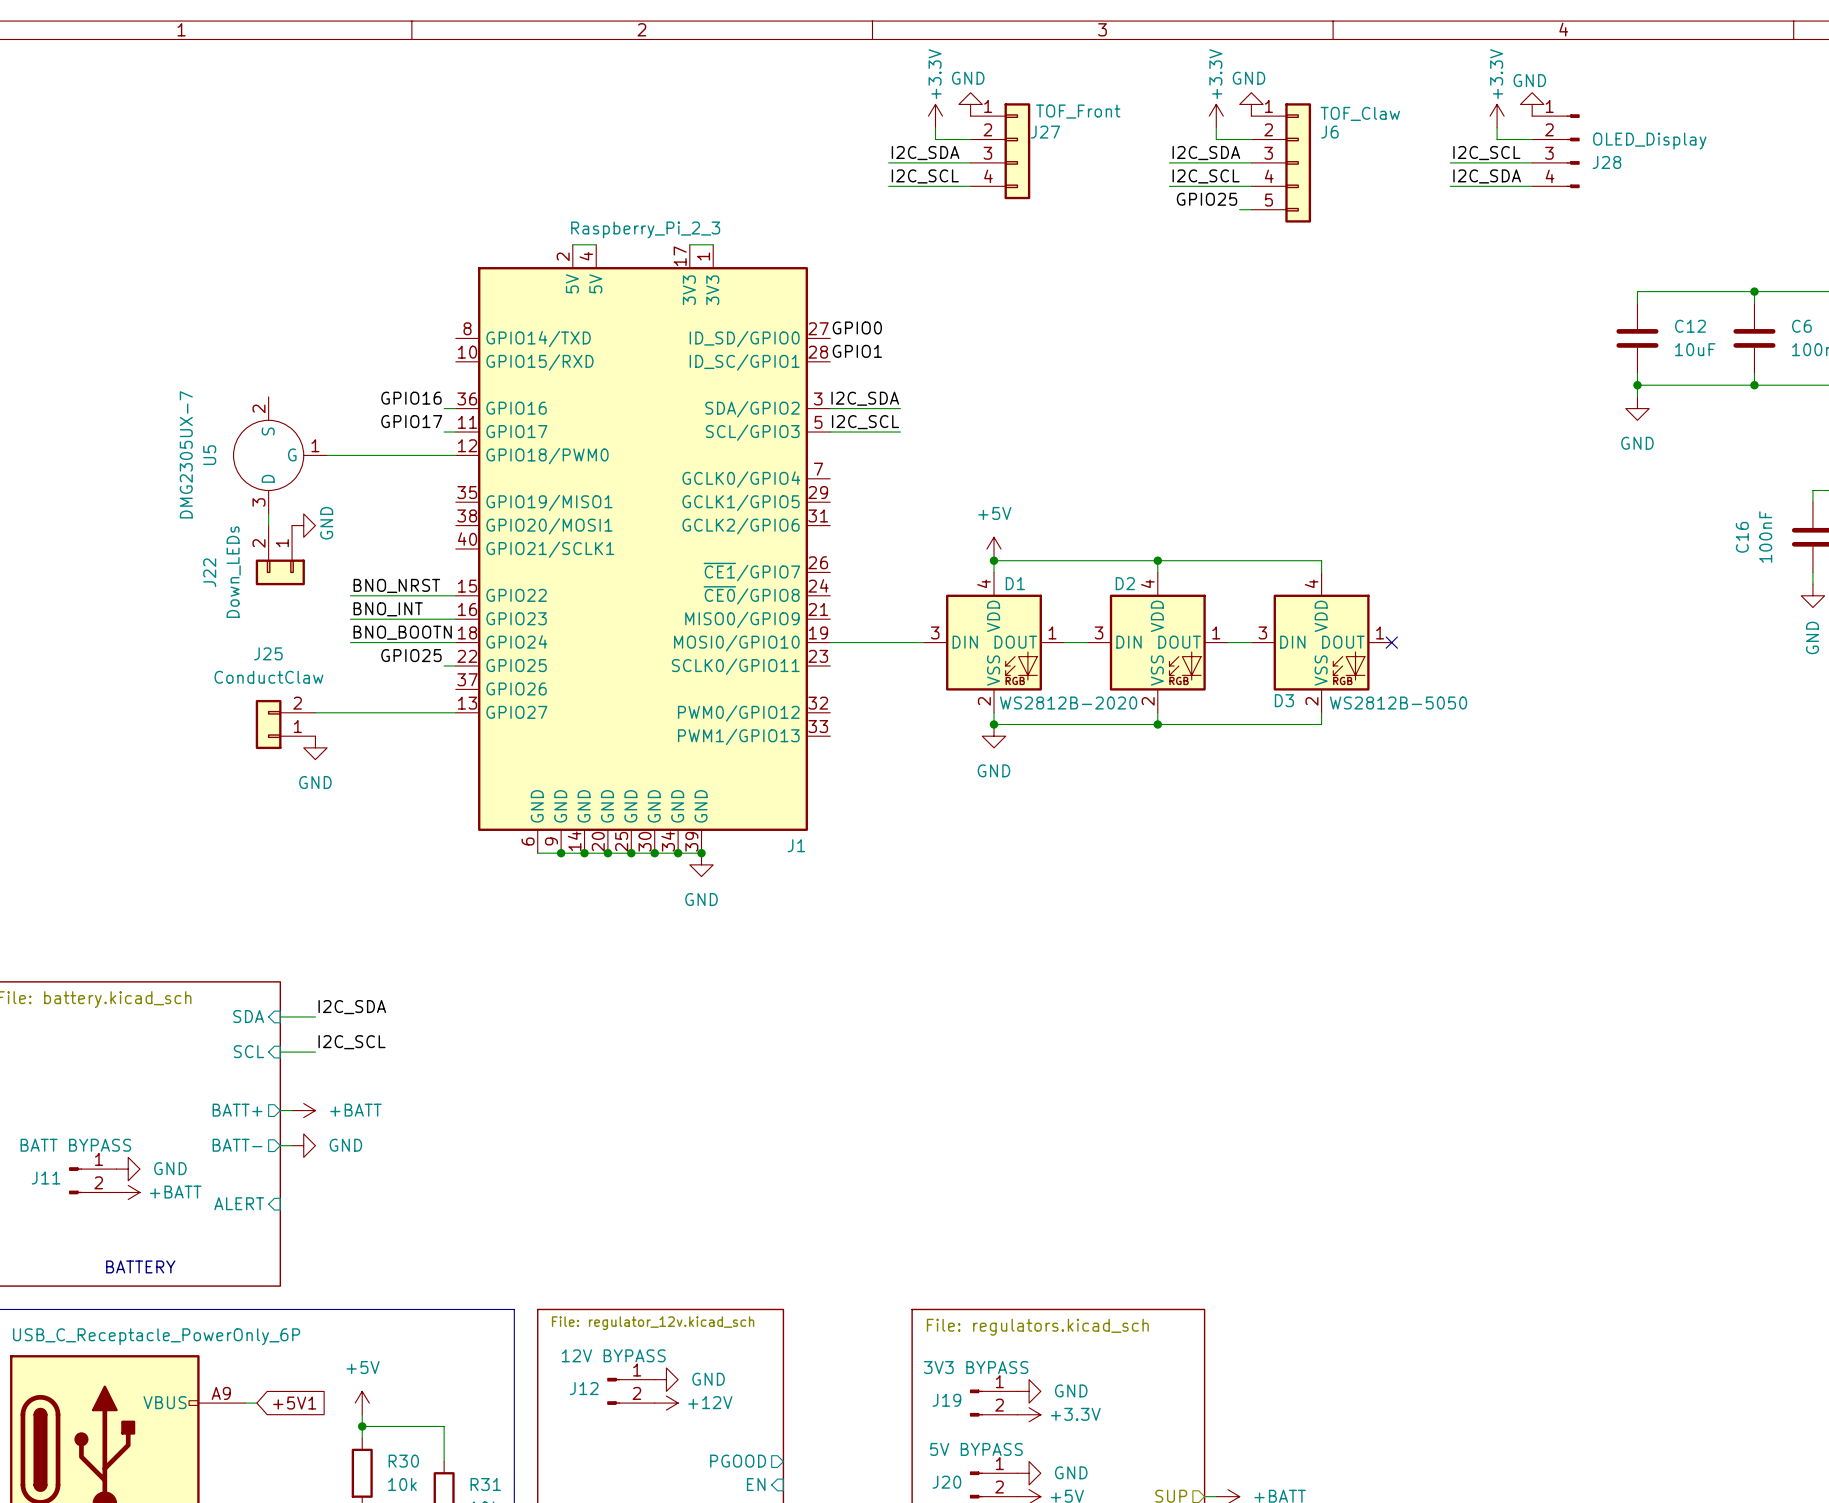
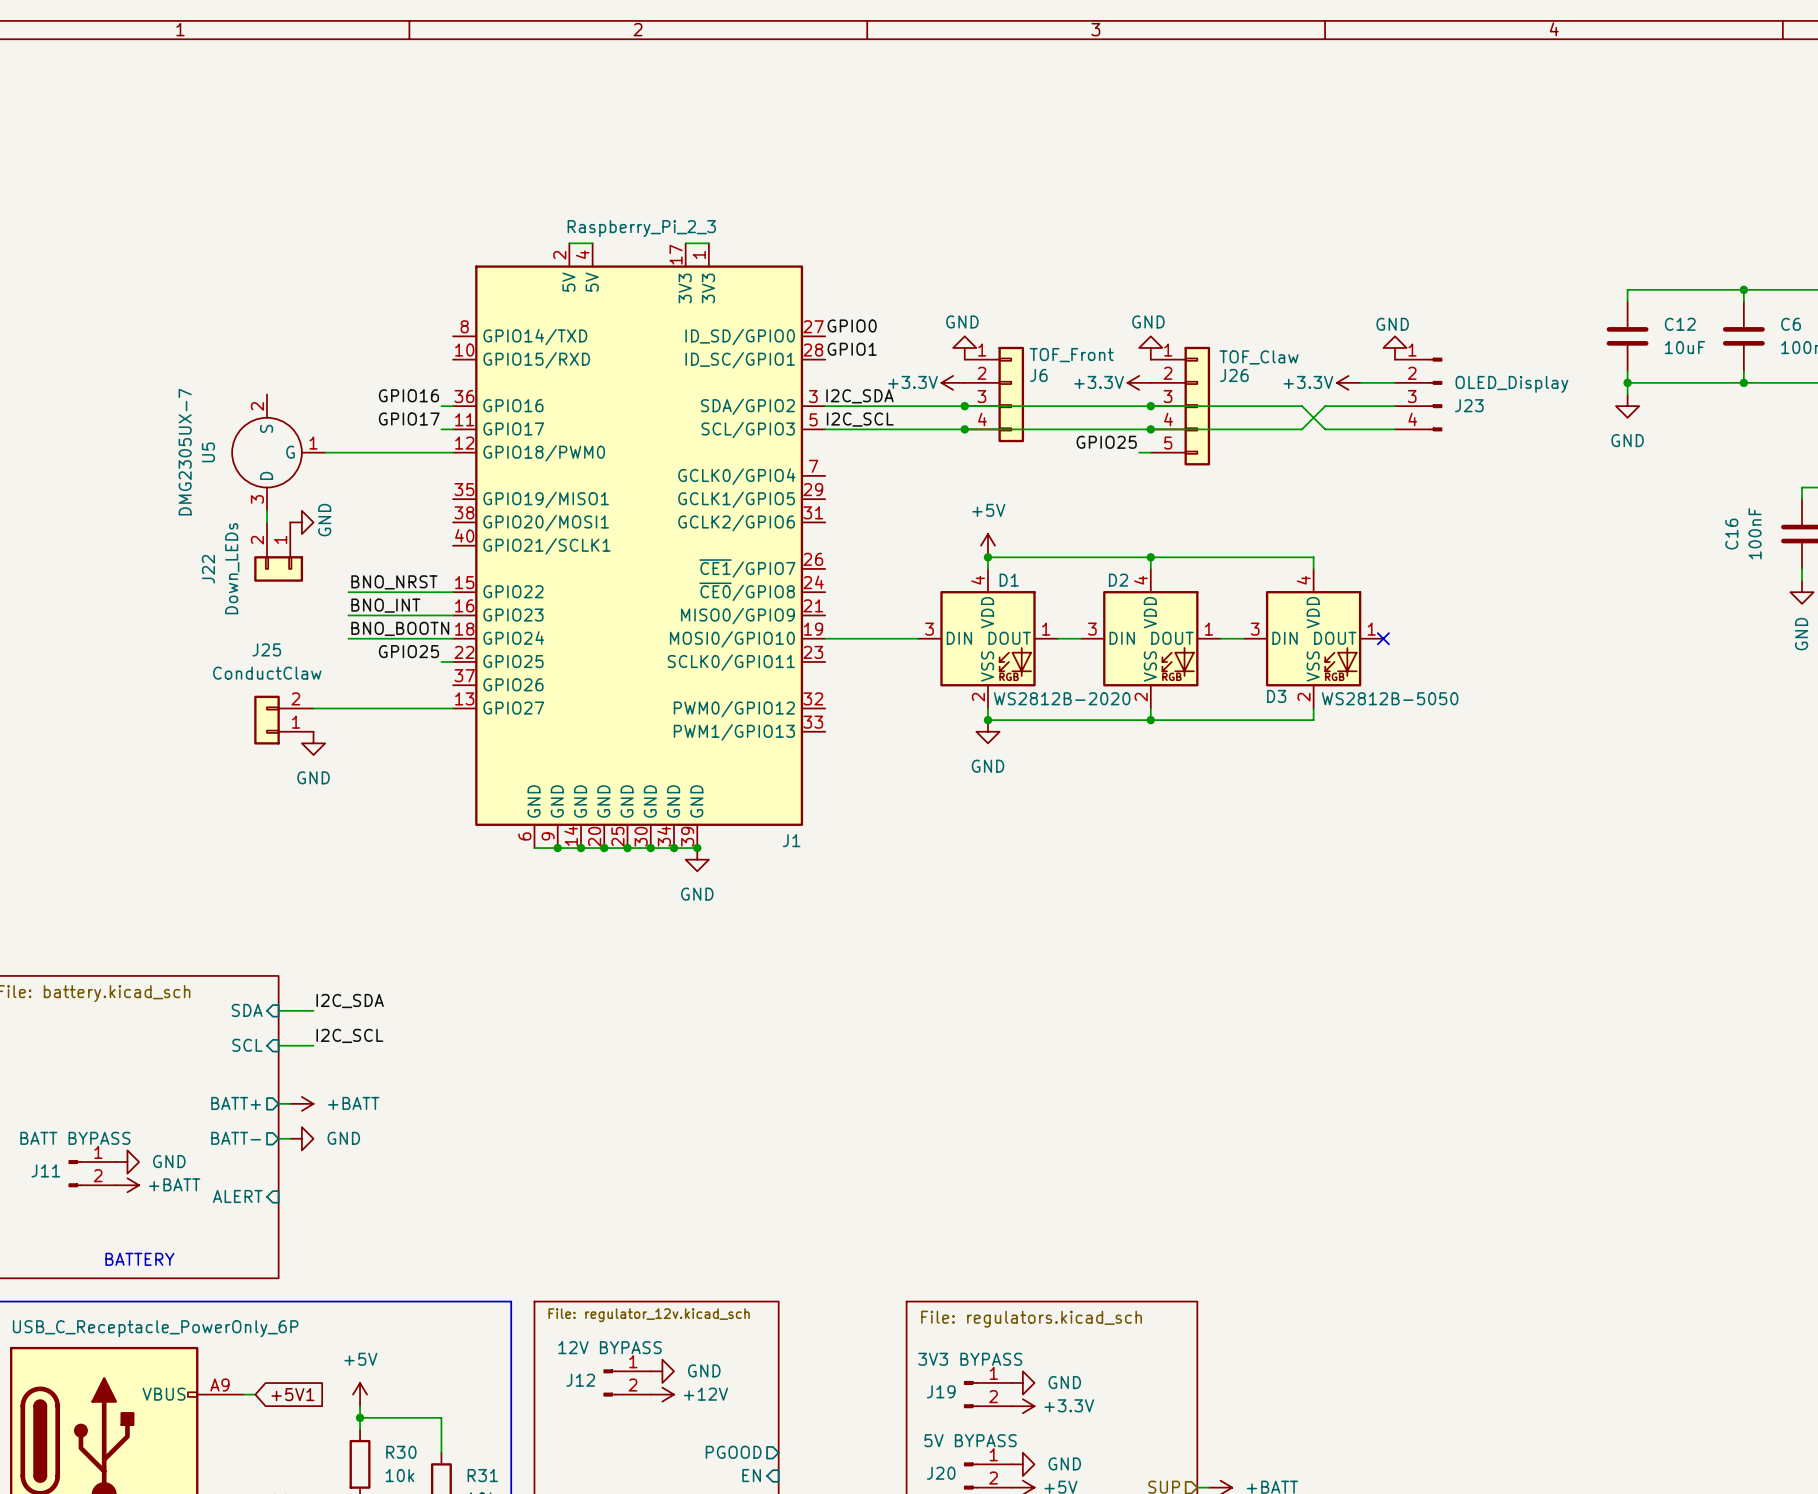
J6 symbol: [1251, 103, 1312, 223] -> [964, 346, 1025, 443]
power symbol: GND (970, 104) -> none
power symbol: GND (1251, 104) -> none
power symbol: GND (1532, 104) -> none
J6 value: TOF_Claw (1360, 113) -> TOF_Front (1071, 355)
power symbol: +3.3V (935, 116) -> none
power symbol: +3.3V (1216, 116) -> none
power symbol: +3.3V (1497, 116) -> none
wire: (935, 127) (935, 139) (970, 139) -> none
wire: (1216, 127) (1216, 139) (1251, 139) -> none
wire: (1497, 127) (1497, 139) (1532, 139) -> none
J27: TOF_Front (1000, 151) -> none
J28: OLED_Display (1555, 151) -> none
label: I2C_SDA (925, 153) -> none
label: I2C_SDA (1206, 153) -> none
label: I2C_SCL (1486, 153) -> none
wire: (888, 162) (970, 162) -> none
wire: (1169, 162) (1251, 162) -> none
wire: (1450, 162) (1532, 162) -> none
label: I2C_SCL (925, 176) -> none
label: I2C_SCL (1206, 176) -> none
label: I2C_SDA (1487, 176) -> none
wire: (888, 186) (970, 186) -> none
wire: (1169, 186) (1251, 186) -> none
wire: (1450, 186) (1532, 186) -> none
label: GPIO25 (1207, 199) -> none
wire: (1239, 209) (1251, 209) -> none
power symbol: none -> GND (964, 348)
power symbol: none -> GND (1150, 348)
power symbol: none -> GND (1395, 348)
power symbol: none -> +3.3V (953, 382)
power symbol: none -> +3.3V (1139, 382)
power symbol: none -> +3.3V (1348, 382)
wire: none -> (1360, 382) (1395, 382)
J23: none -> OLED_Display (1418, 394)
wire: none -> (894, 406) (1301, 406) (1325, 429) (1395, 429)
junction: none -> (964, 406)
junction: none -> (1150, 406)
J26: none -> TOF_Claw (1180, 406)
wire: none -> (1395, 406) (1325, 406) (1301, 429) (894, 429)
junction: none -> (964, 429)
junction: none -> (1150, 429)
label: none -> GPIO25 (1106, 442)
wire: none -> (1139, 452) (1150, 452)

